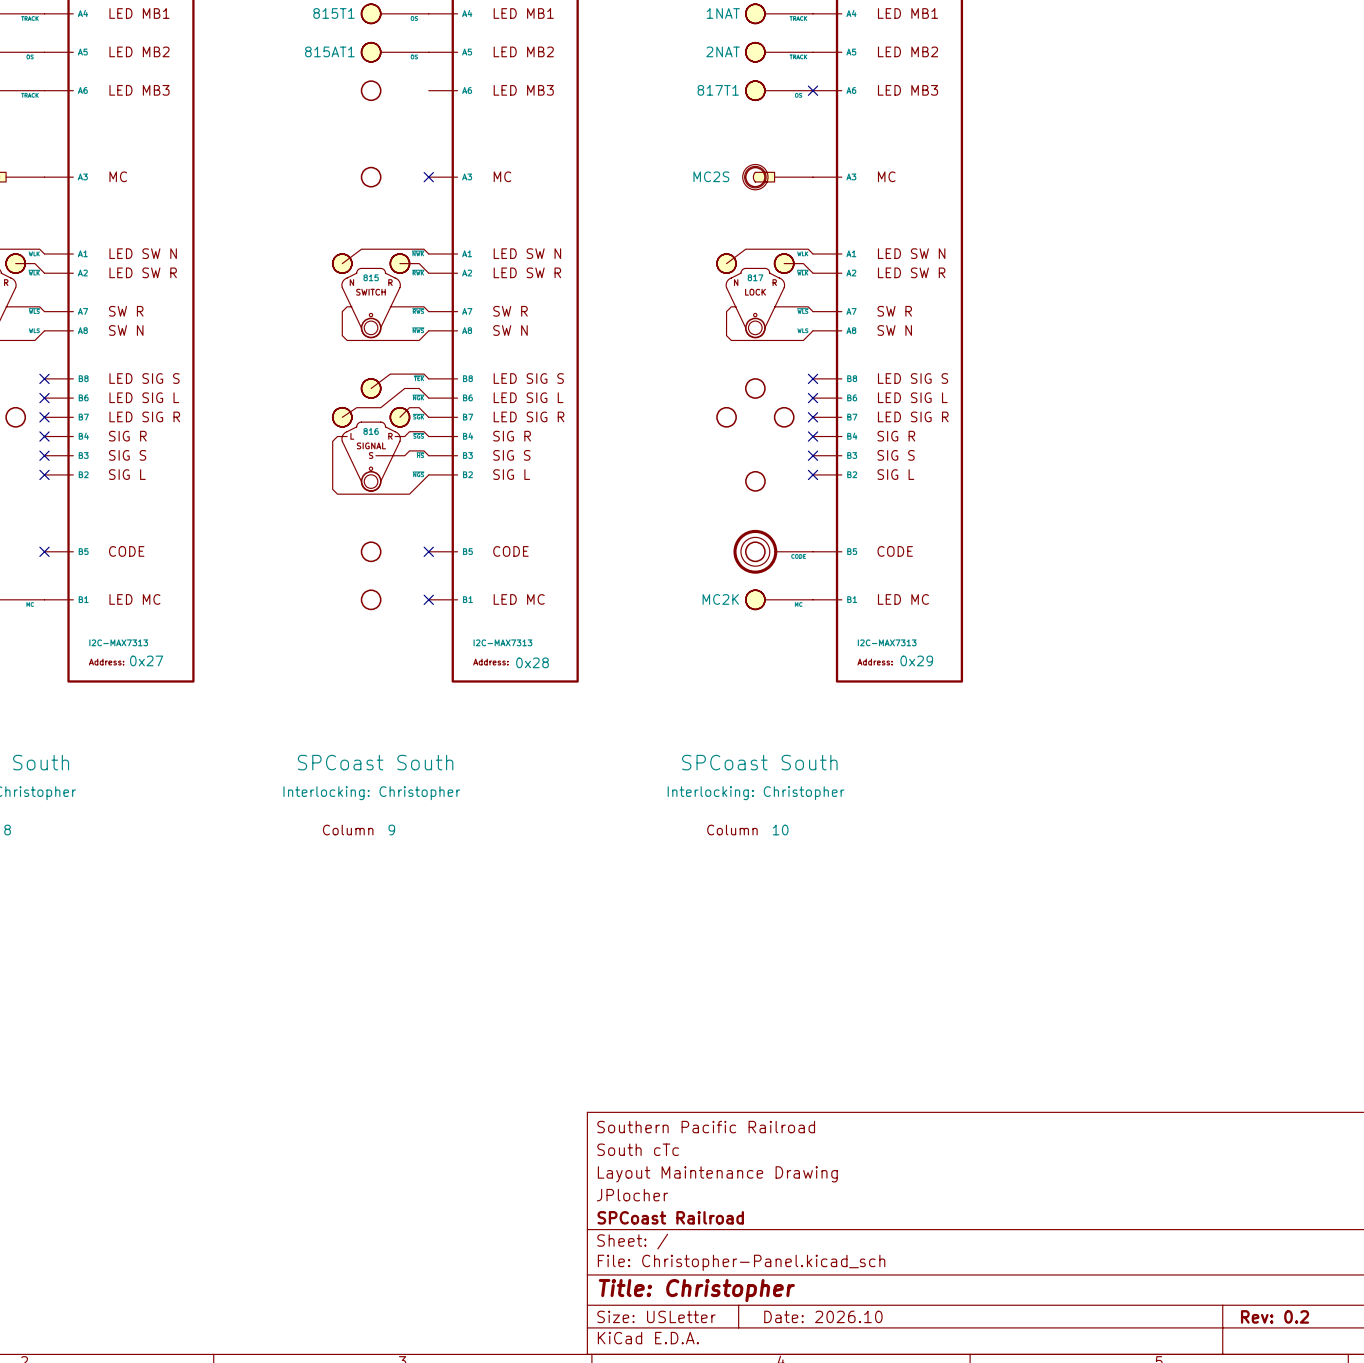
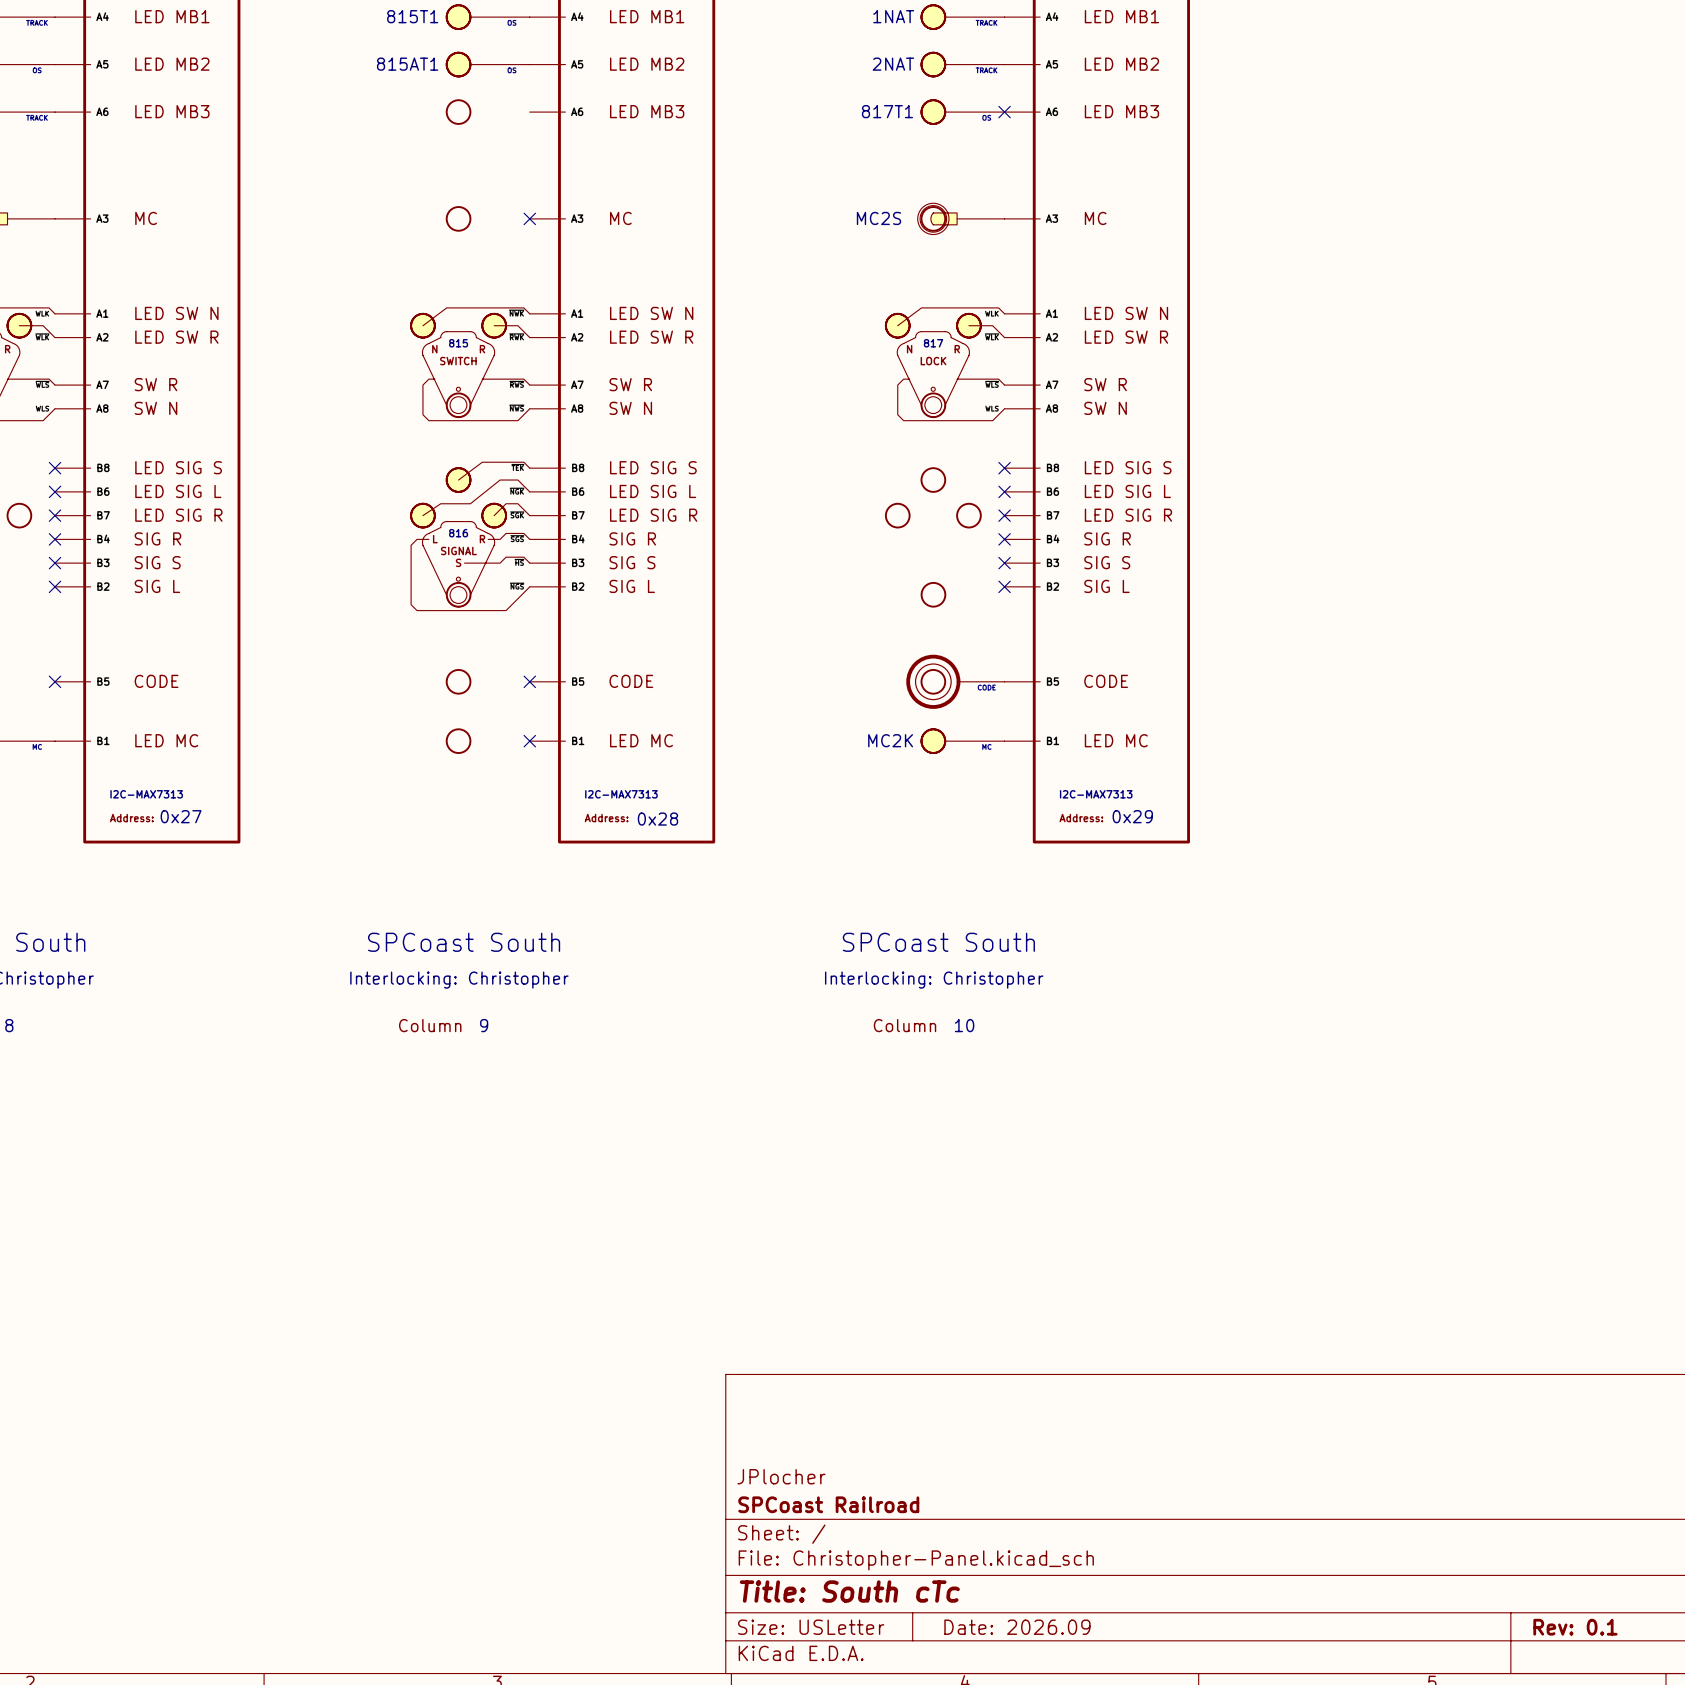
title block: Southern Pacific Railroad (706, 1127) -> none
title block: South cTc (638, 1149) -> none
title block: Layout Maintenance Drawing (717, 1174) -> none
title block: Title: Christopher (696, 1290) -> Title: South cTc (849, 1591)
title block: Date: 2026.10 (823, 1316) -> Date: 2026.09 (1017, 1627)
title block: Rev: 0.2 (1275, 1316) -> Rev: 0.1 (1575, 1627)

